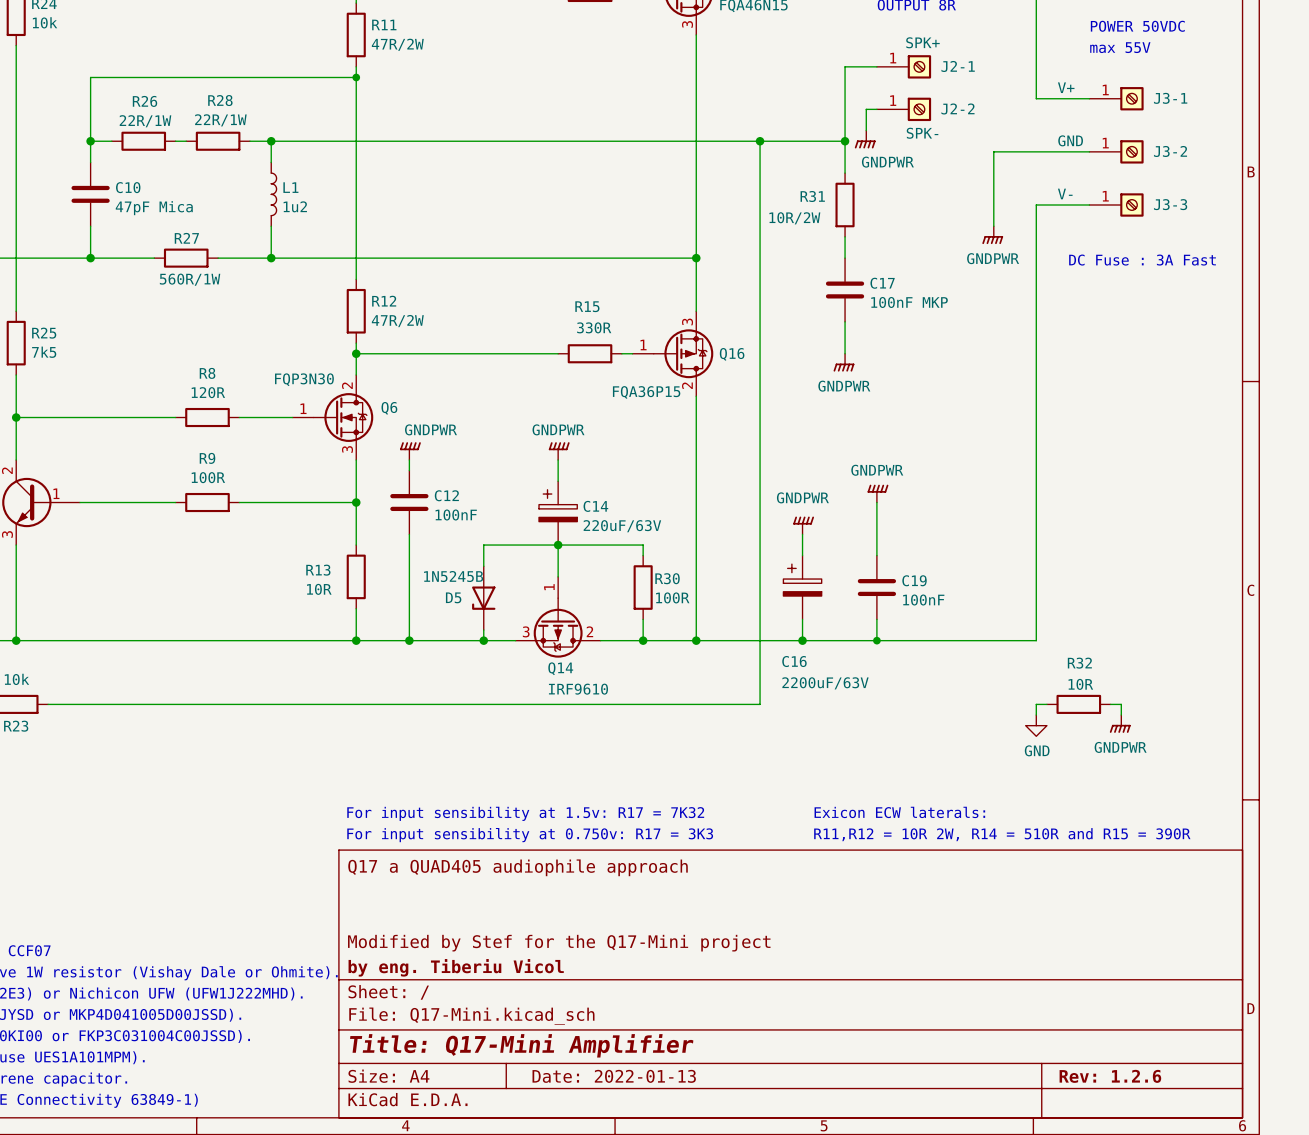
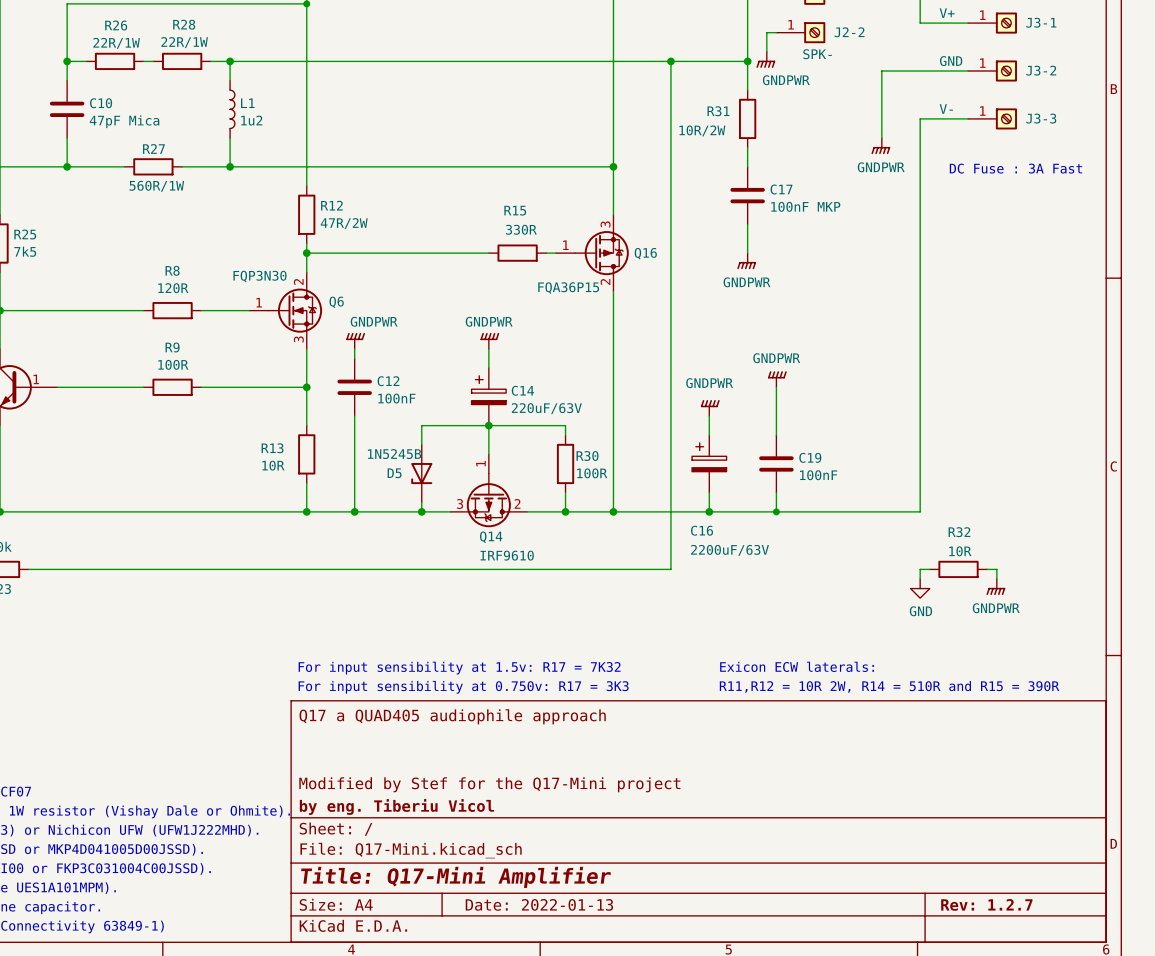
title block: Rev: 1.2.6 (1110, 1076) -> Rev: 1.2.7 (986, 904)

